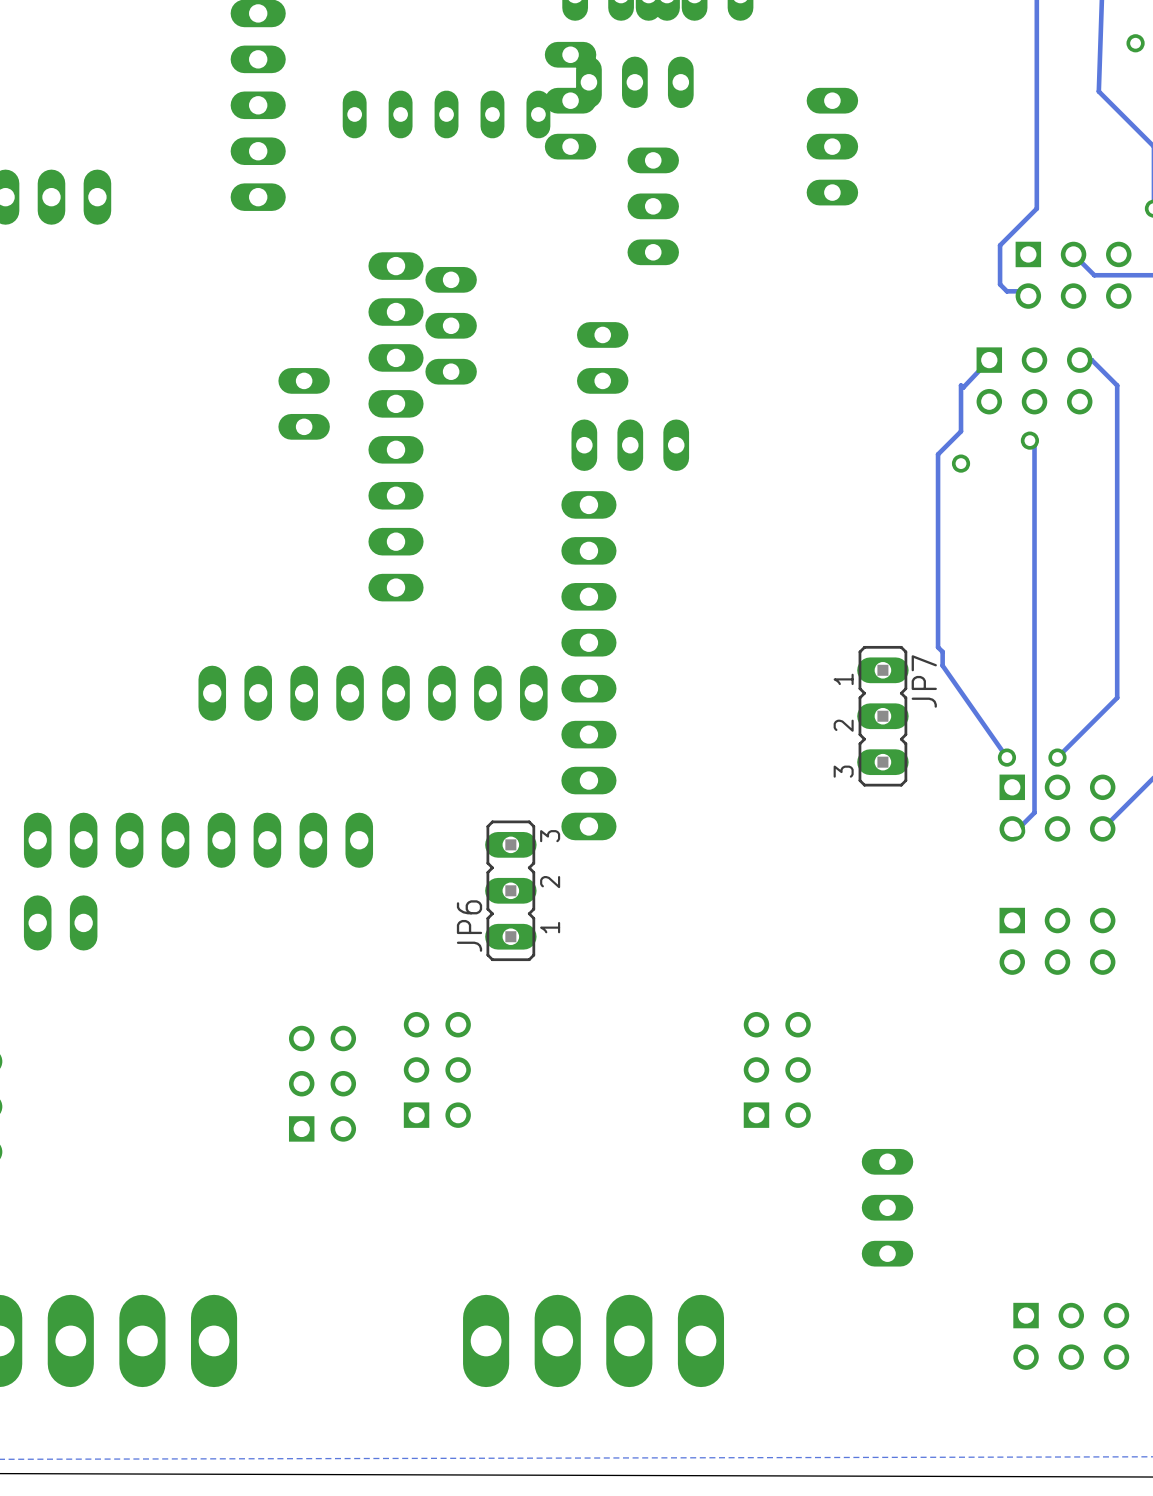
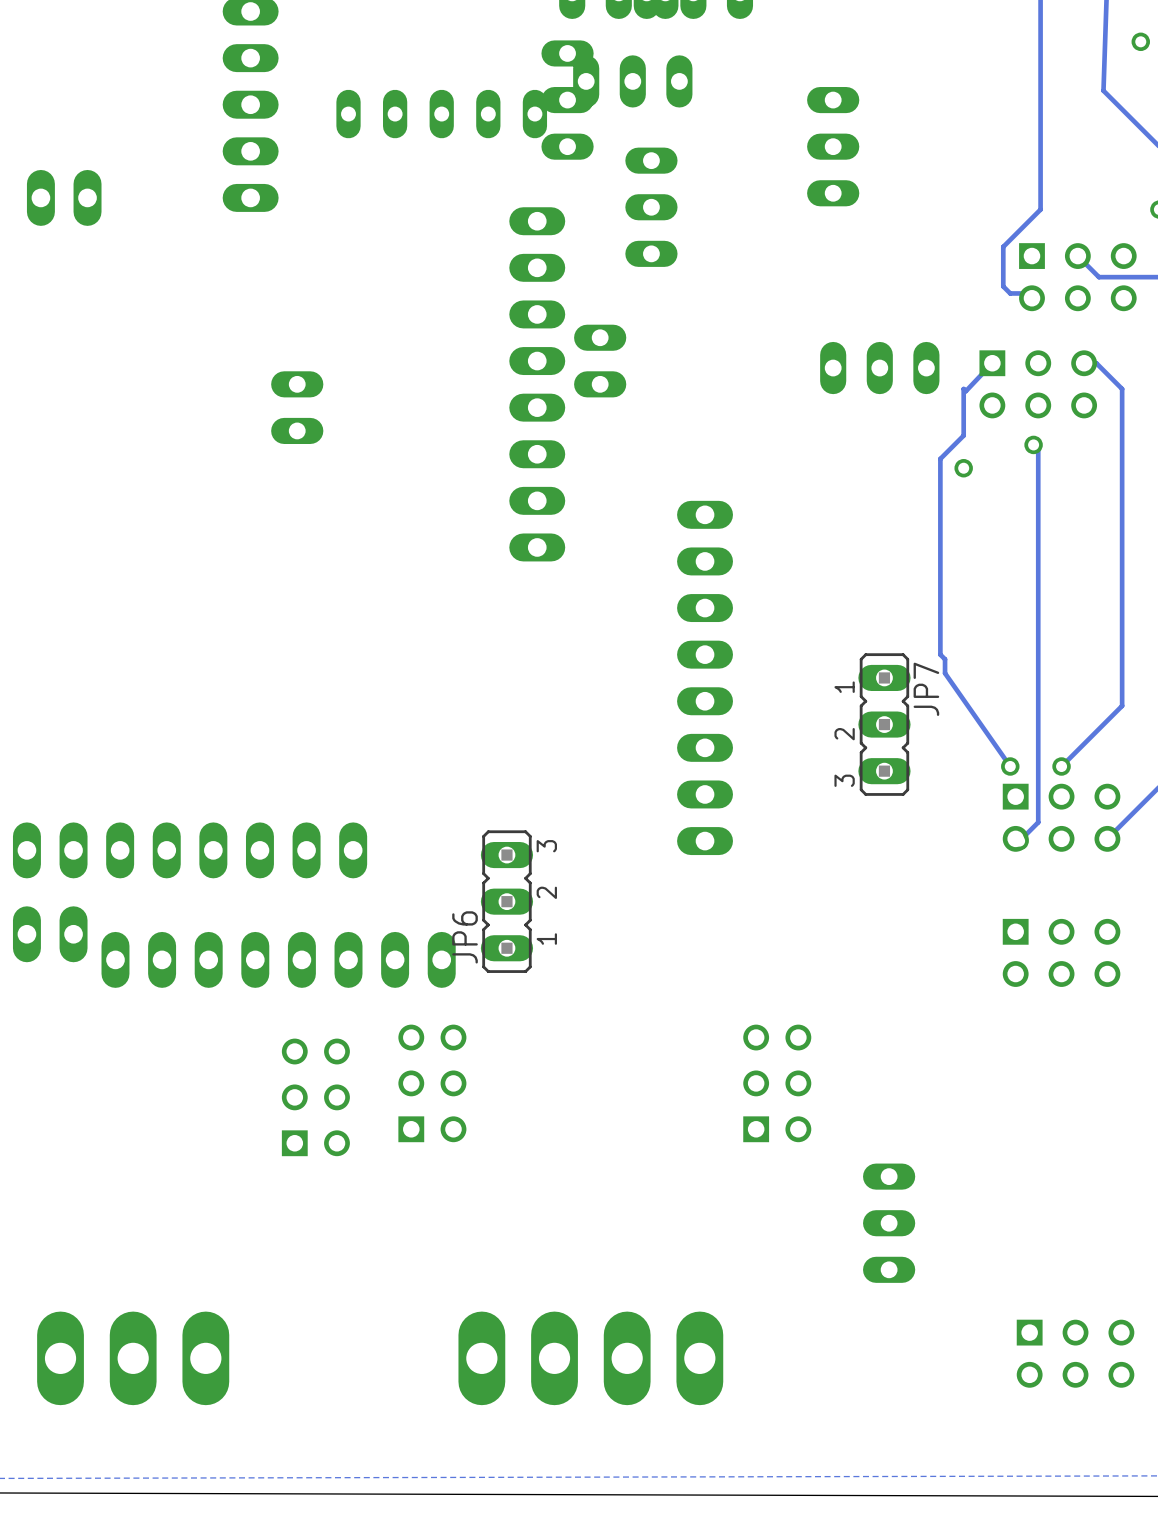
part: (451, 325) -> none
part: none -> (879, 368)
part: none -> (537, 384)
part: (396, 426) -> none
part: (630, 445) -> none
part position: (588, 665) -> (705, 677)
part: (373, 693) -> none
part: none -> (278, 959)

